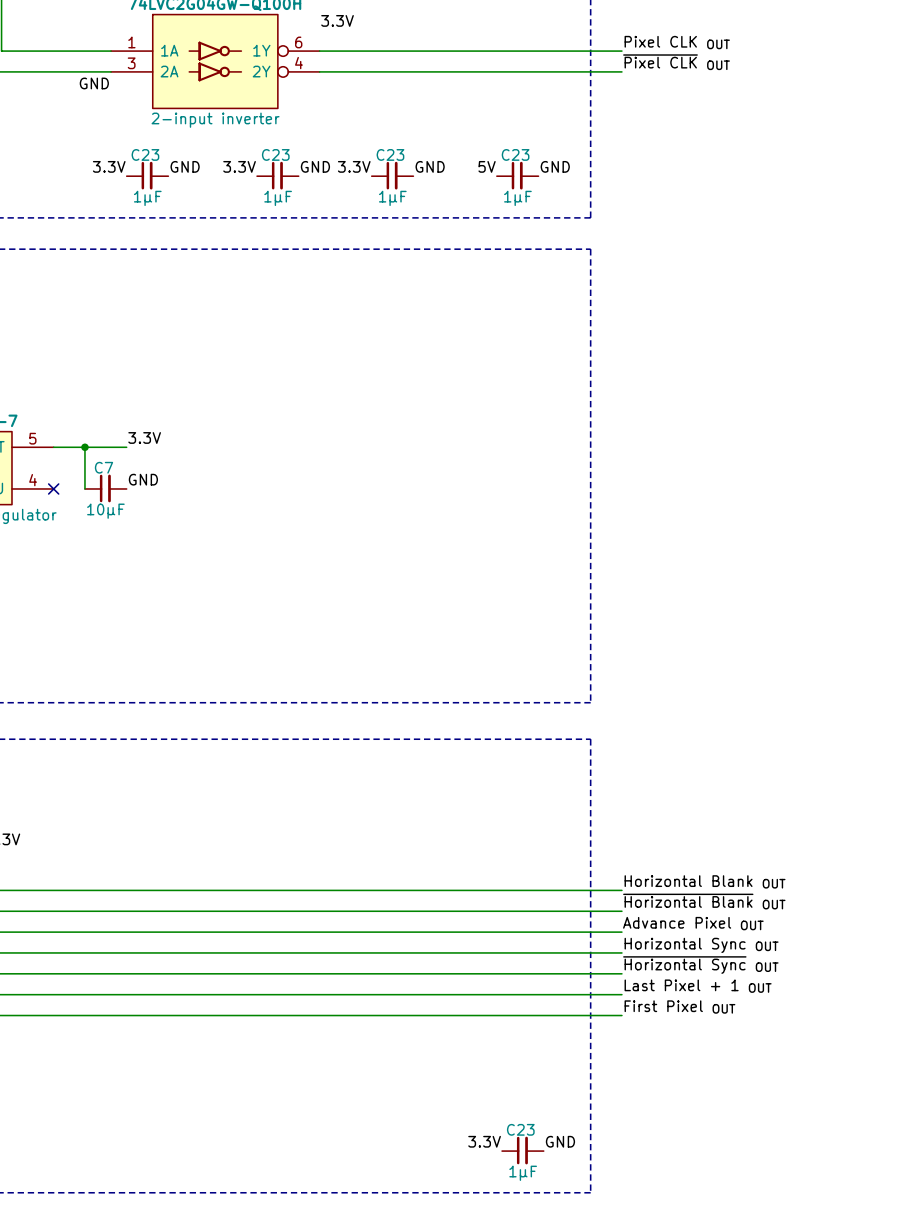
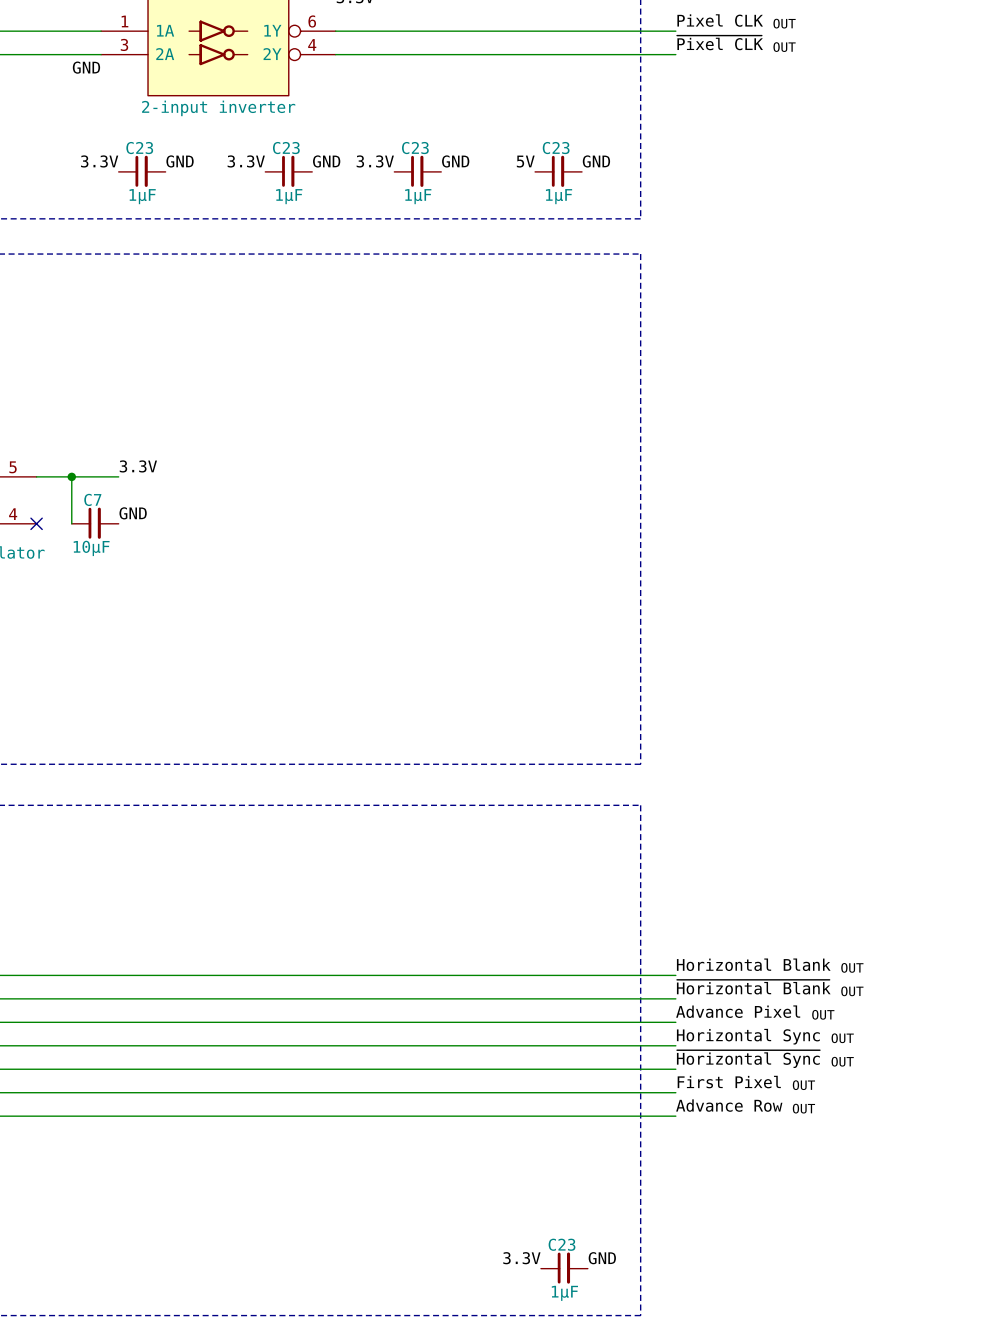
label: Last Pixel + 1 OUT (698, 986) -> First Pixel OUT (746, 1082)
label: First Pixel OUT (679, 1007) -> Advance Row OUT (745, 1106)

